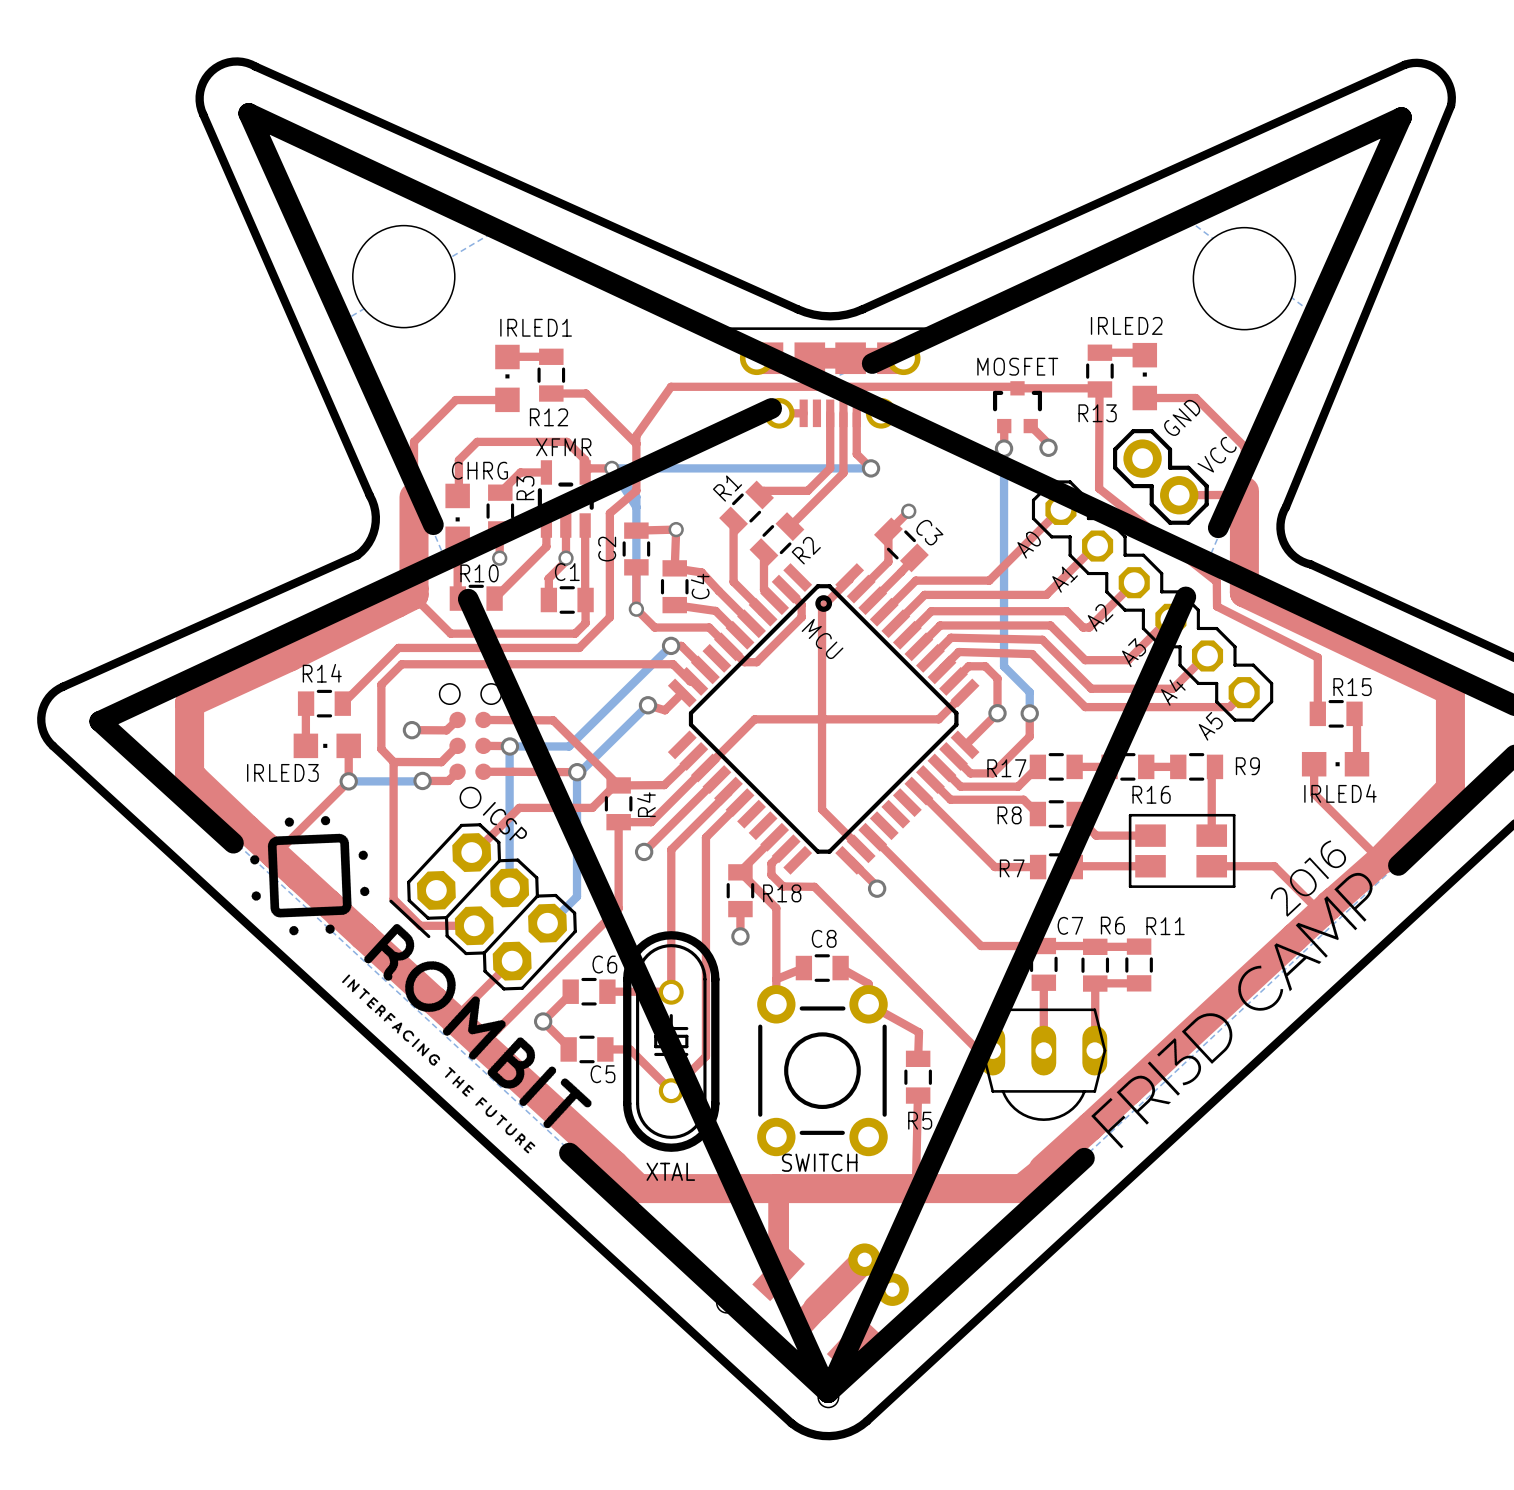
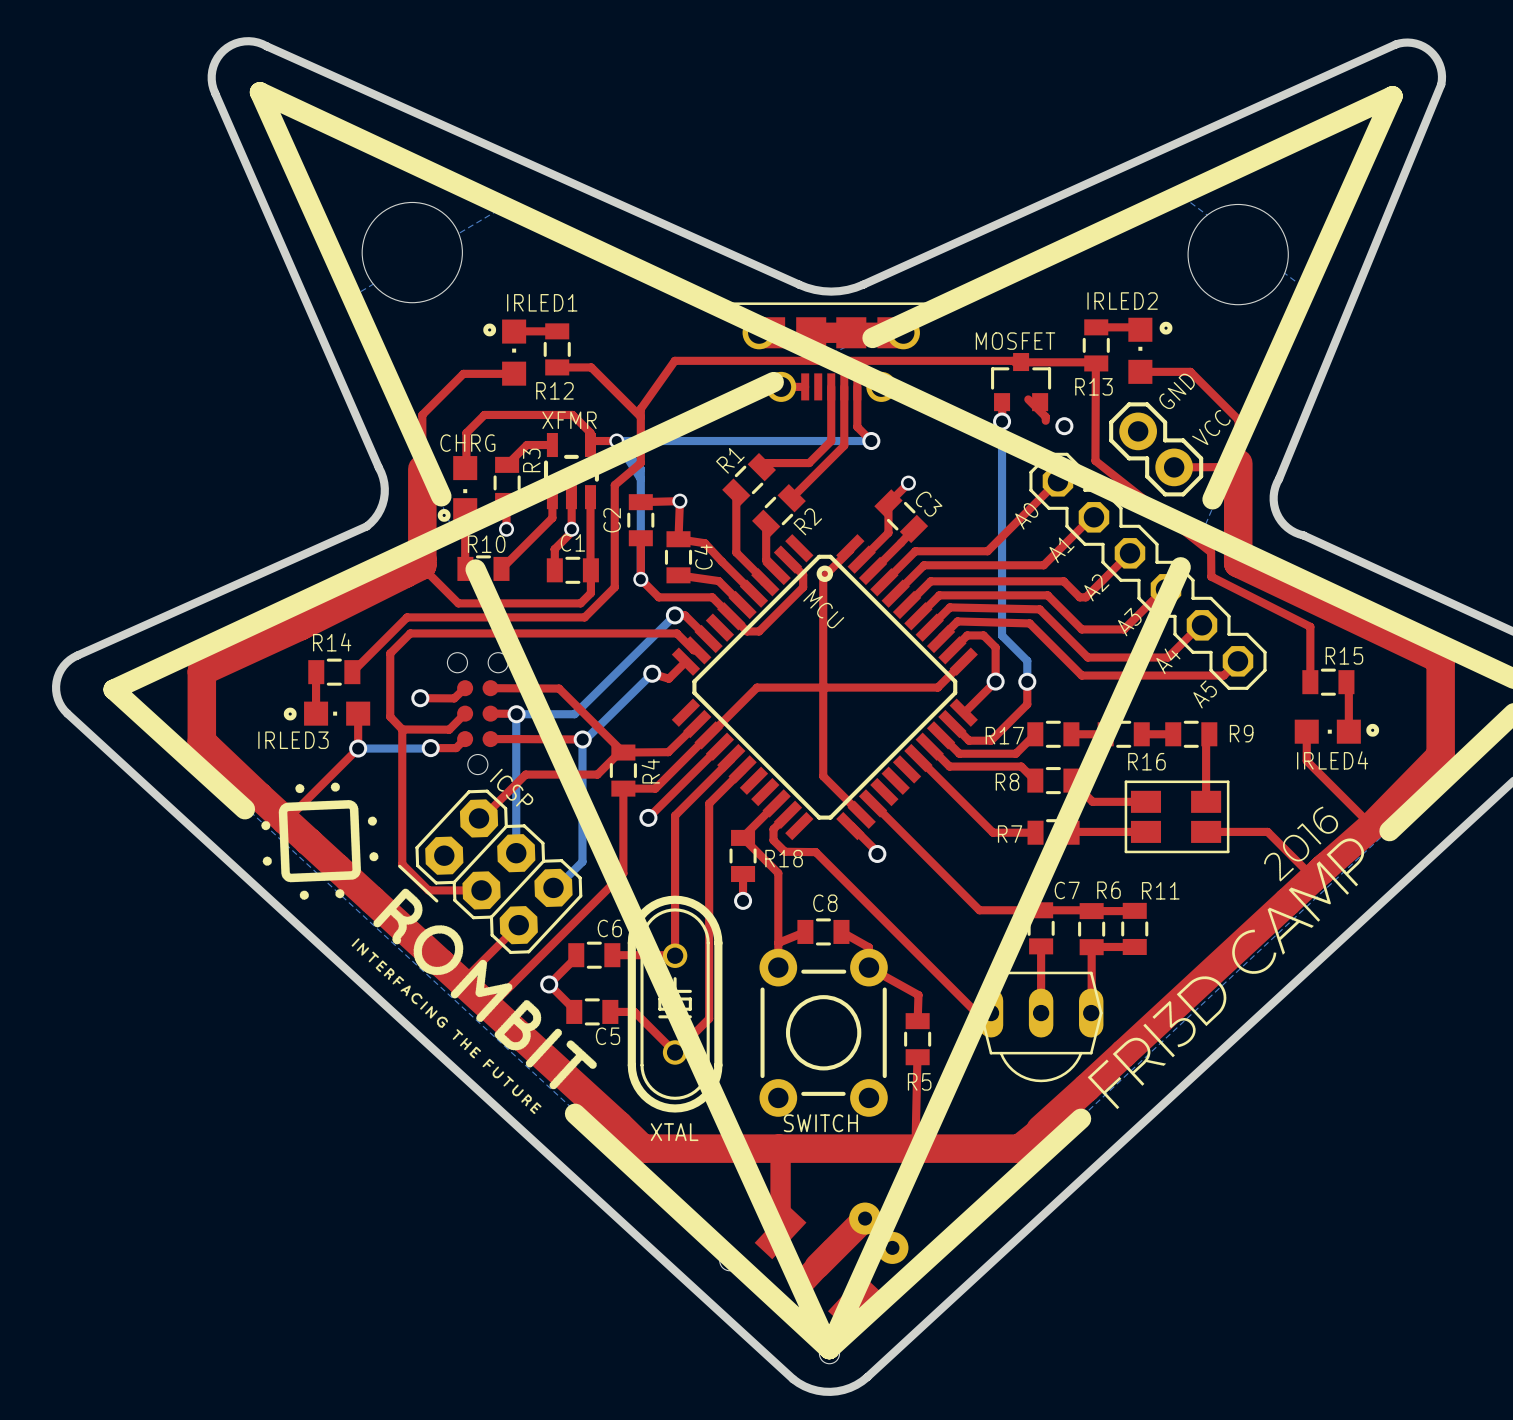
drawing: none -> [1159, 321, 1173, 335]
drawing: none -> [483, 323, 497, 337]
MOSFET footprint: [992, 381, 1043, 434] -> [991, 353, 1052, 412]
via position: (1048, 447) -> (1064, 426)
part value position: CHRG (479, 470) -> CHRG (467, 443)
drawing: none -> [437, 508, 451, 522]
drawing: none -> [283, 707, 297, 721]
drawing: none -> [1366, 723, 1380, 737]

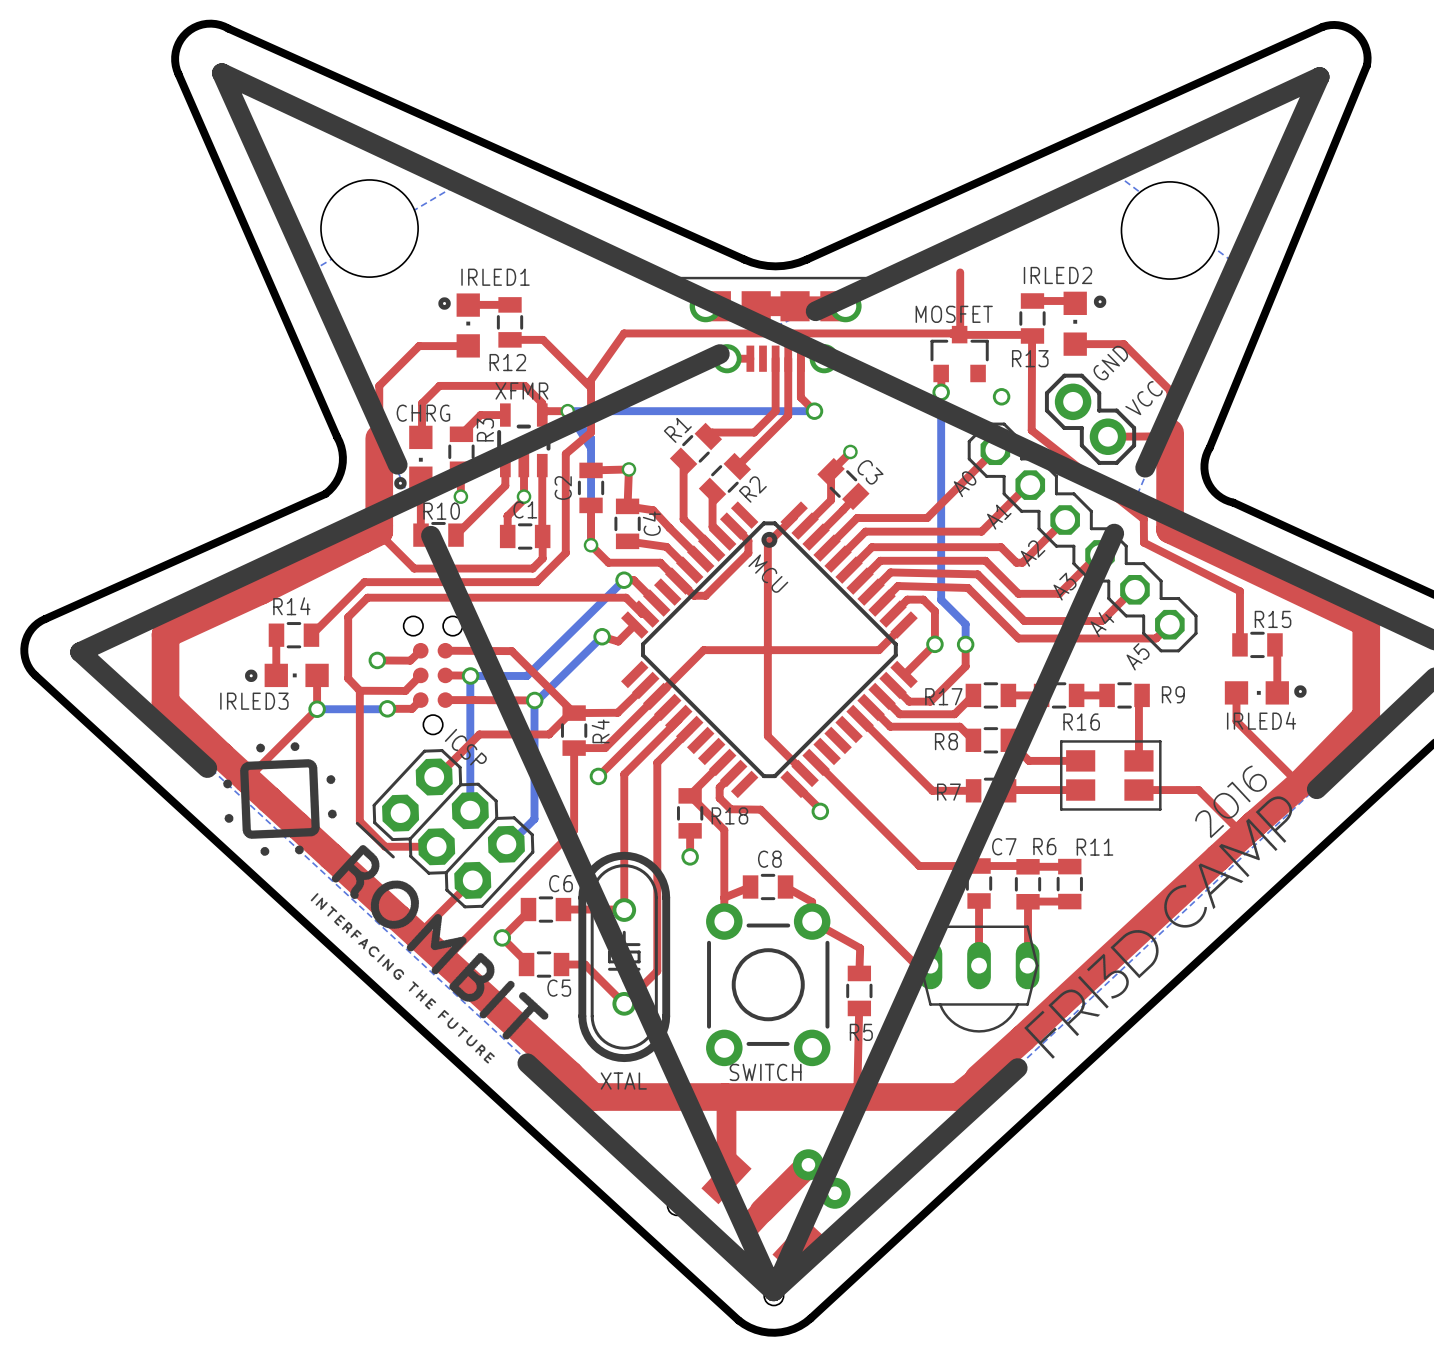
top track: none -> (960, 272) (959, 334)
top track: (1028, 399) (1045, 416) (1045, 420) -> none

